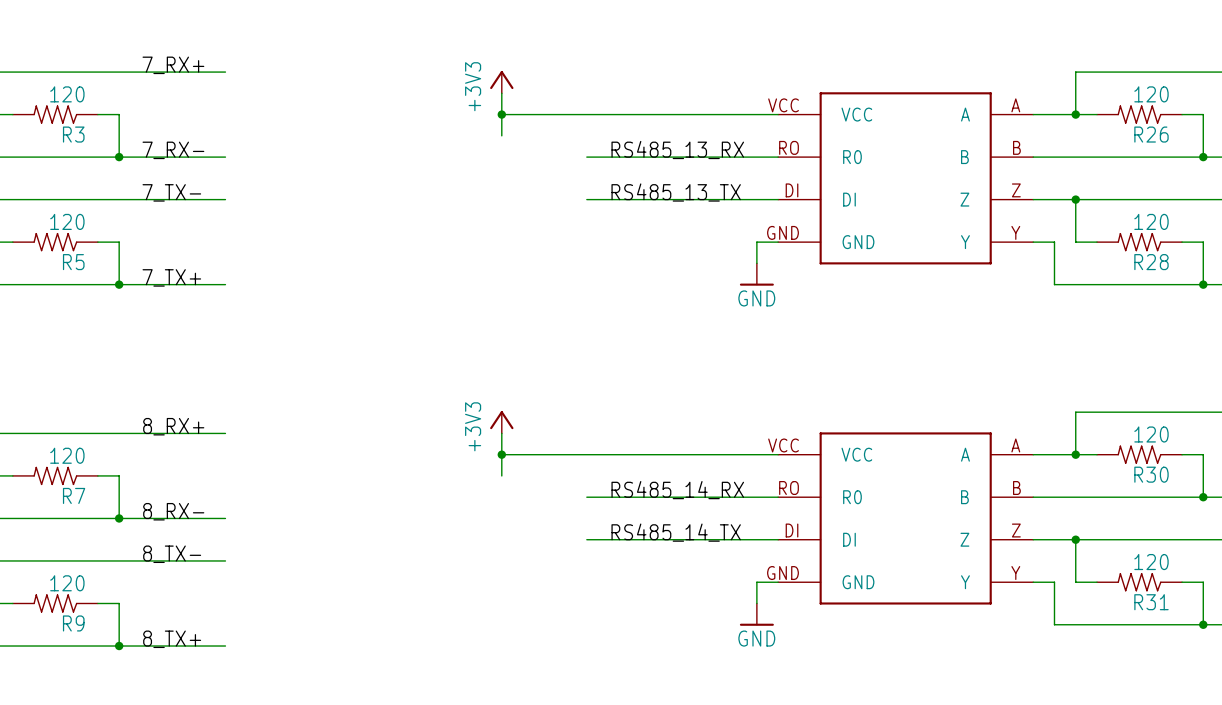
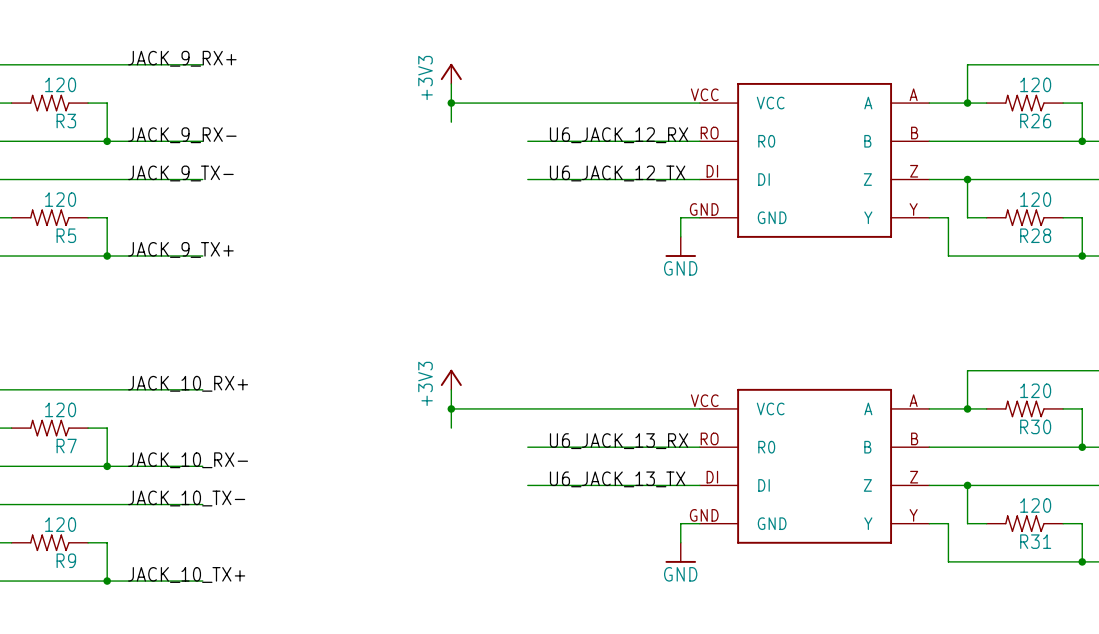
label: 7_RX+ (173, 65) -> JACK_9_RX+ (182, 58)
label: 7_RX- (173, 150) -> JACK_9_RX- (182, 135)
label: RS485_13_RX (677, 150) -> U6_JACK_12_RX (619, 135)
label: 7_TX- (171, 192) -> JACK_9_TX- (180, 173)
label: RS485_13_TX (676, 192) -> U6_JACK_12_TX (617, 173)
label: 7_TX+ (171, 277) -> JACK_9_TX+ (180, 249)
label: 8_RX+ (173, 426) -> JACK_10_RX+ (188, 383)
label: RS485_14_RX (677, 490) -> U6_JACK_13_RX (619, 441)
label: 8_RX- (173, 511) -> JACK_10_RX- (188, 460)
label: RS485_14_TX (676, 532) -> U6_JACK_13_TX (617, 479)
label: 8_TX- (172, 554) -> JACK_10_TX- (186, 498)
label: 8_TX+ (172, 639) -> JACK_10_TX+ (186, 574)

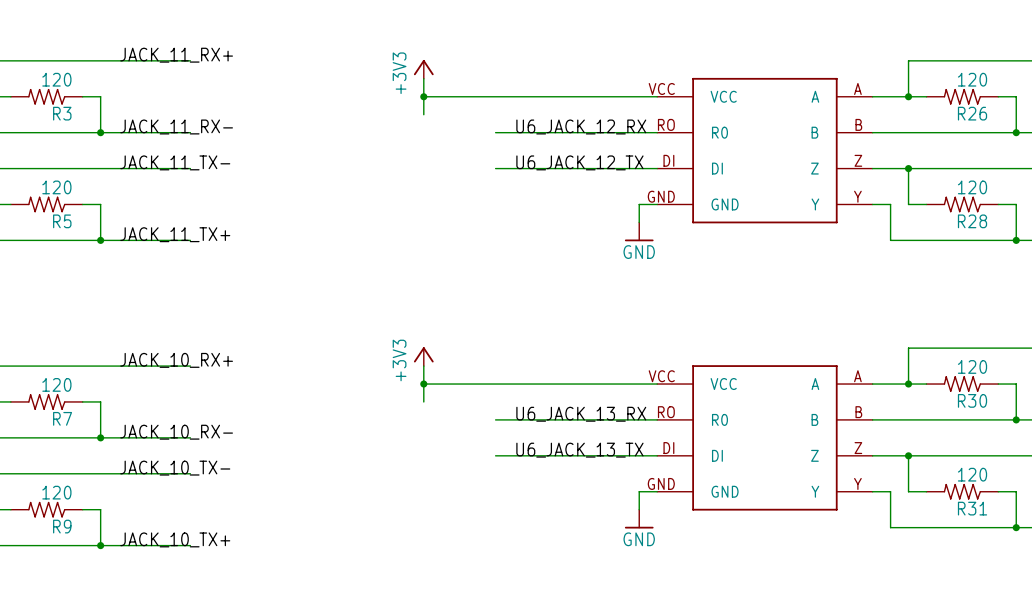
label: JACK_9_RX+ (182, 58) -> JACK_11_RX+ (176, 55)
label: JACK_9_RX- (182, 135) -> JACK_11_RX- (176, 126)
label: JACK_9_TX- (180, 173) -> JACK_11_TX- (175, 162)
label: JACK_9_TX+ (180, 249) -> JACK_11_TX+ (175, 234)

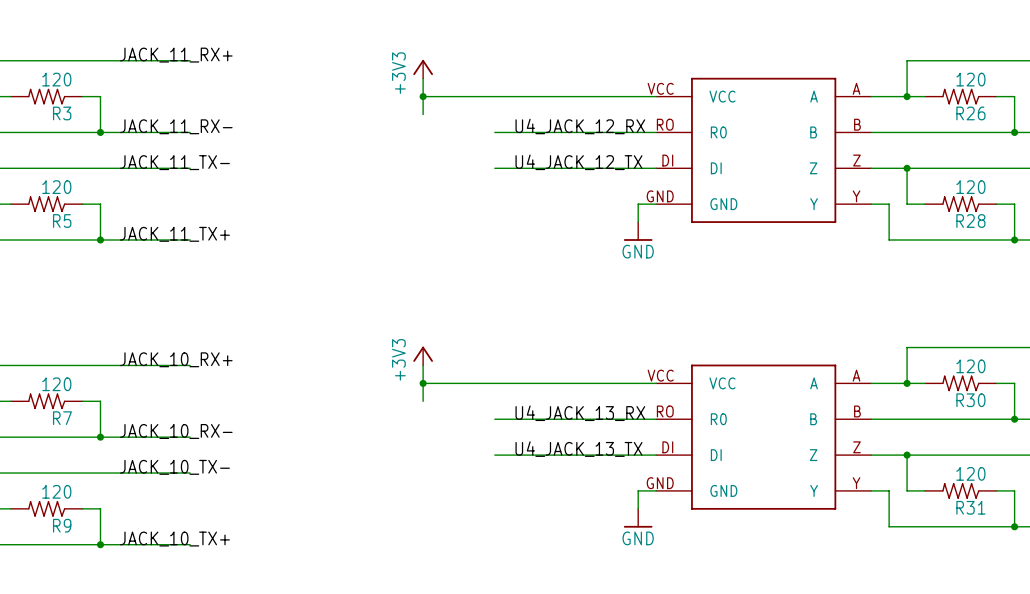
label: U6_JACK_12_RX (581, 126) -> U4_JACK_12_RX (580, 126)
label: U6_JACK_12_TX (579, 162) -> U4_JACK_12_TX (578, 162)
label: U6_JACK_13_RX (581, 414) -> U4_JACK_13_RX (580, 413)
label: U6_JACK_13_TX (579, 450) -> U4_JACK_13_TX (578, 449)

